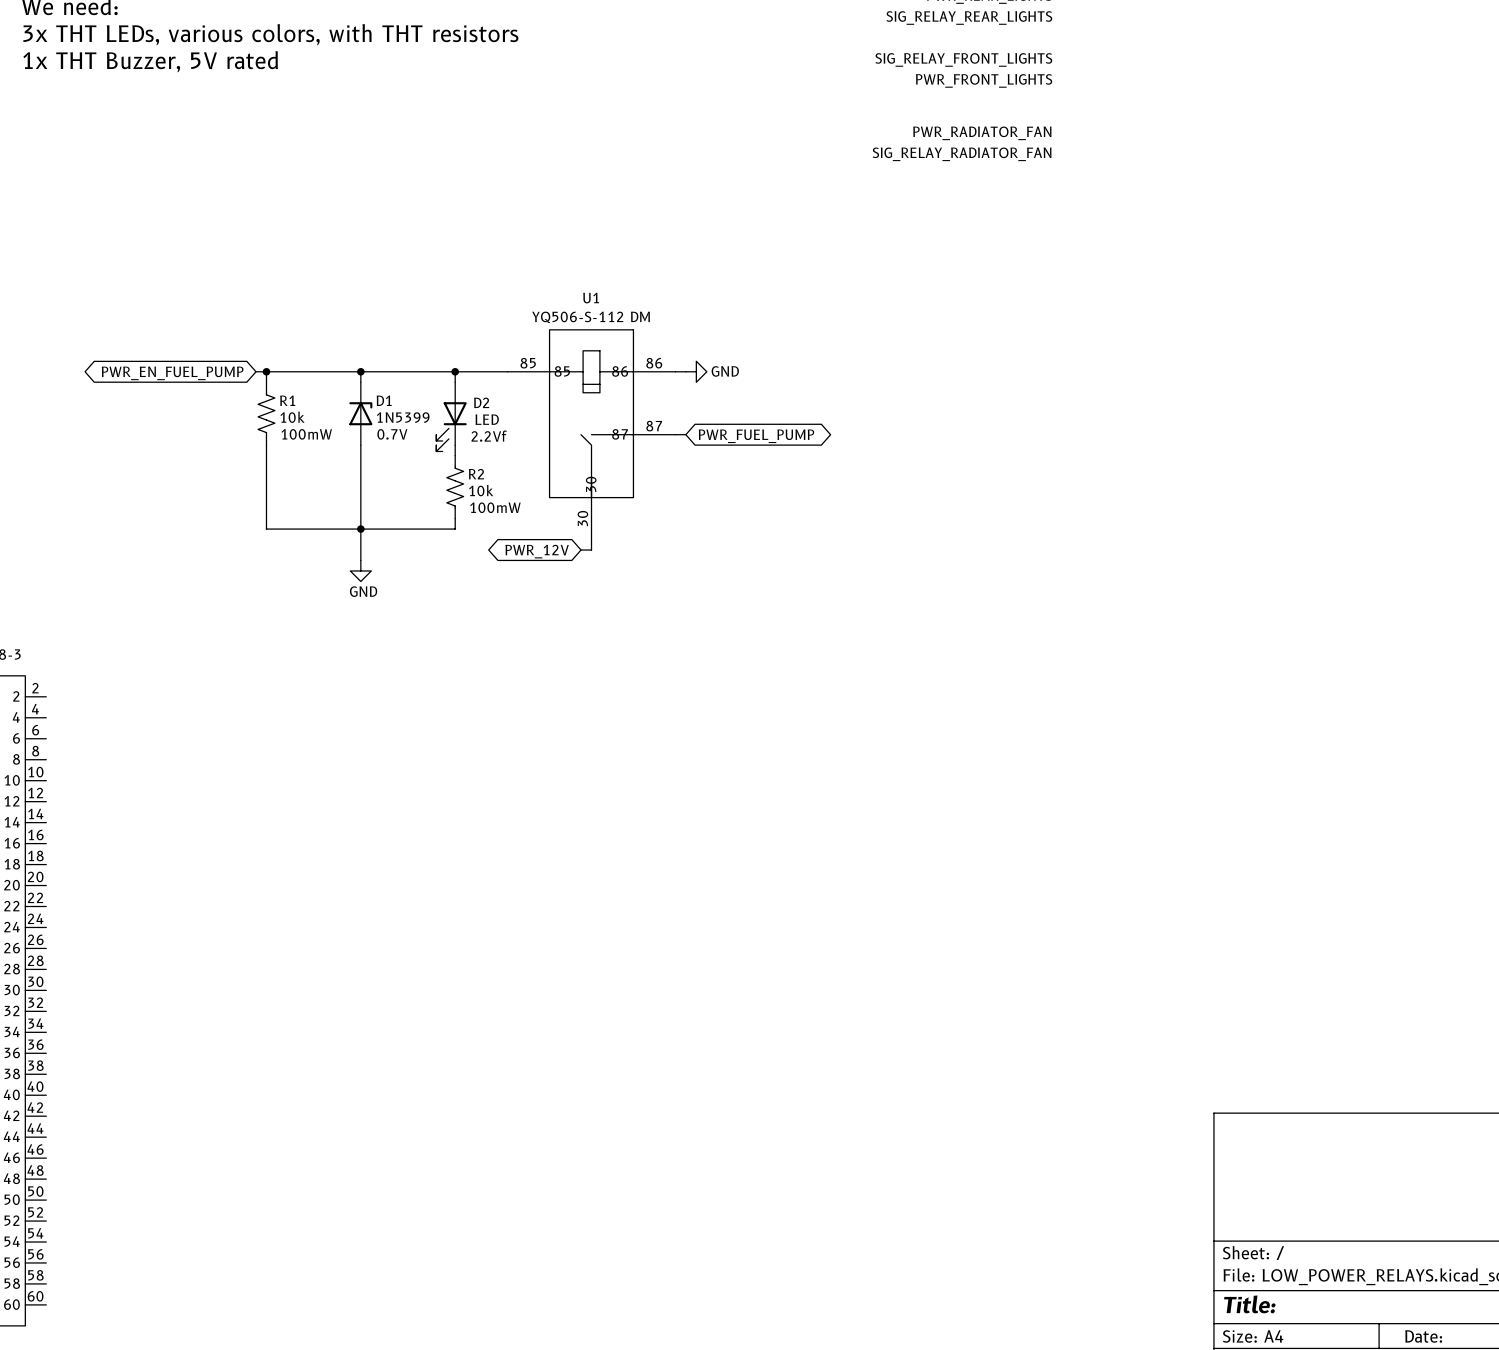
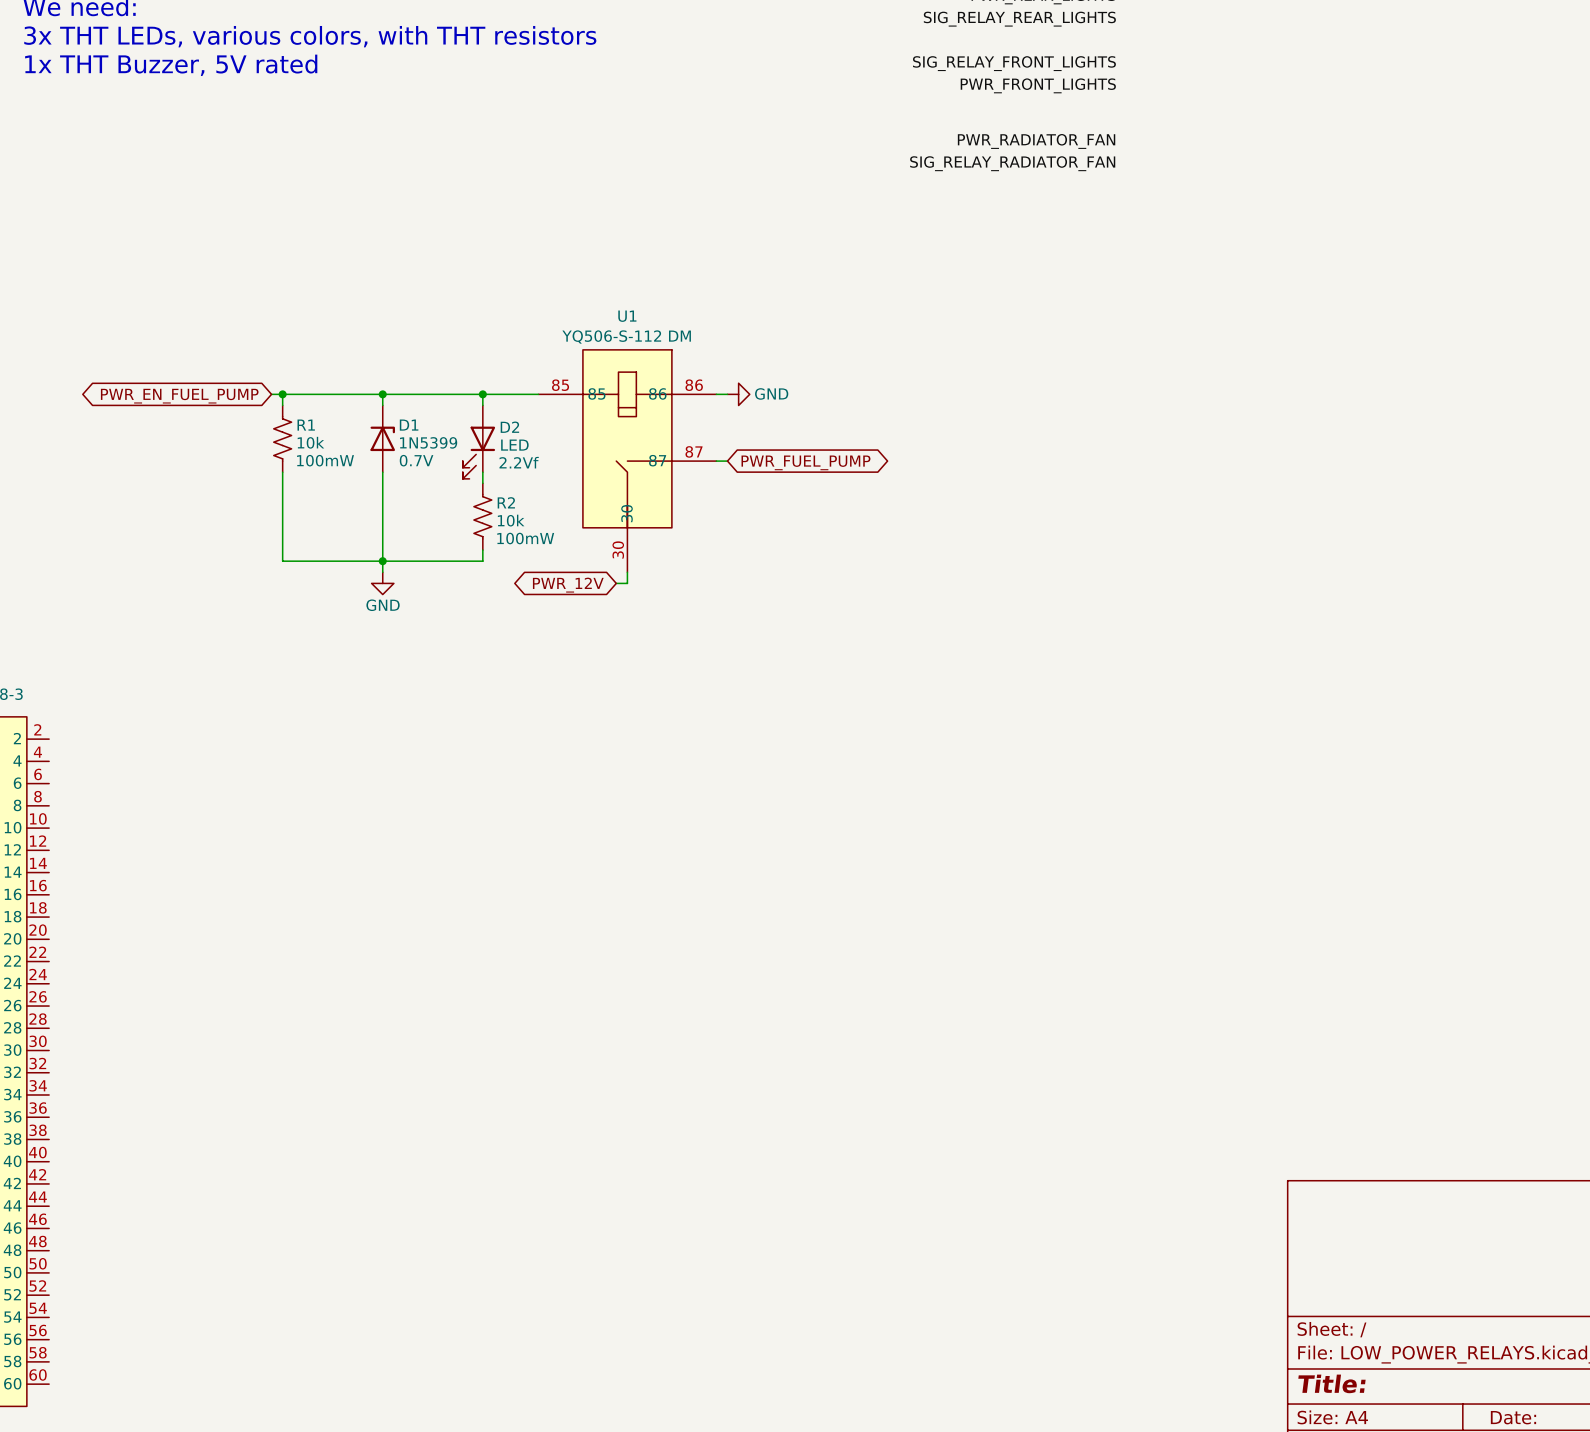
power symbol position: GND (360, 570) -> GND (382, 583)

